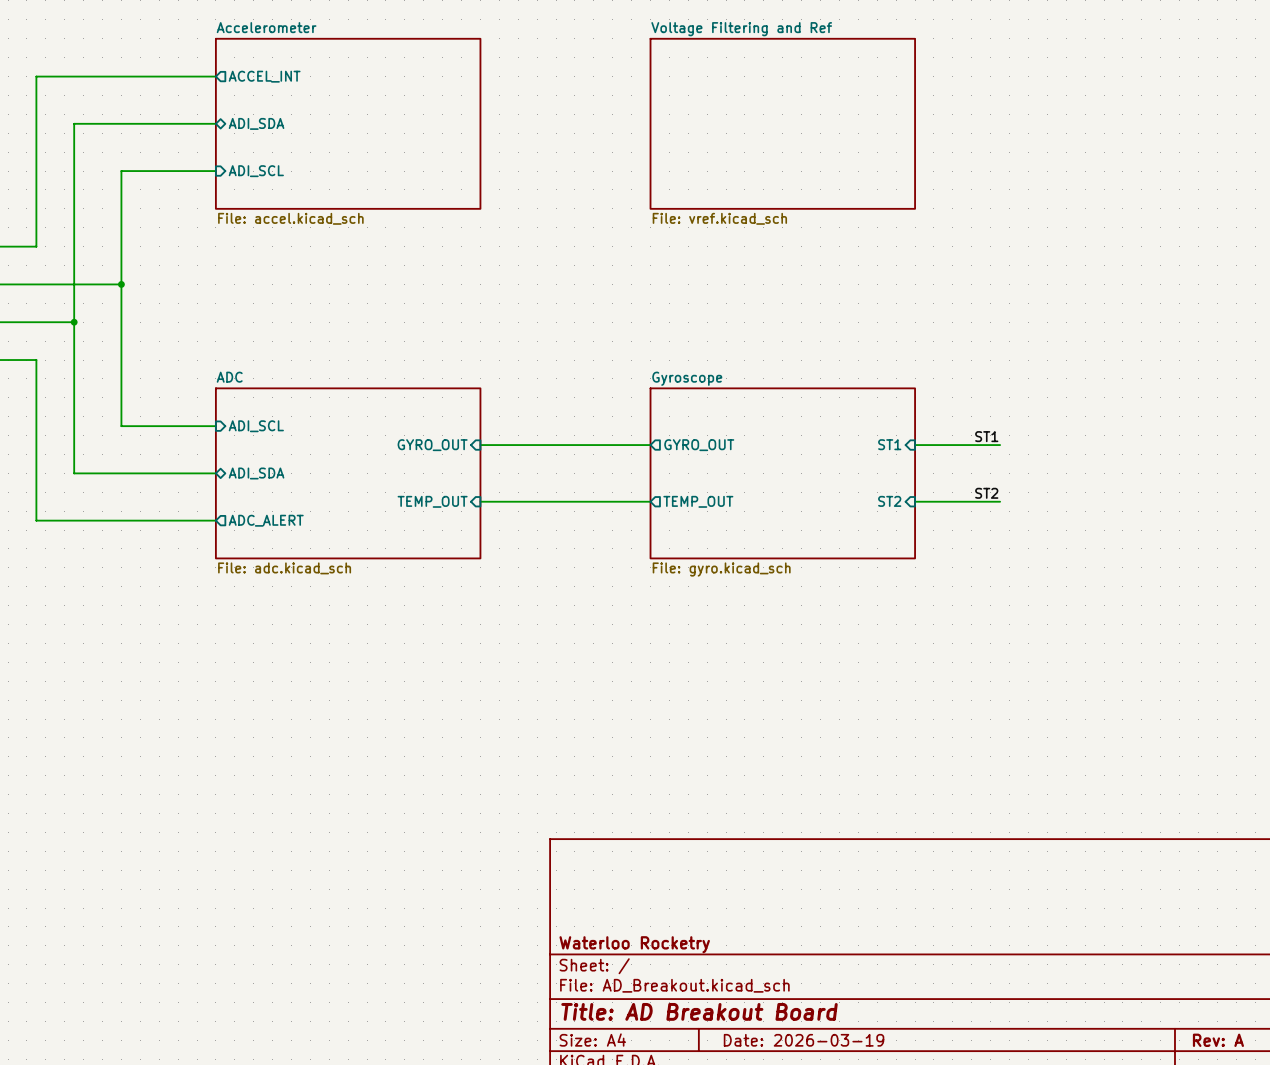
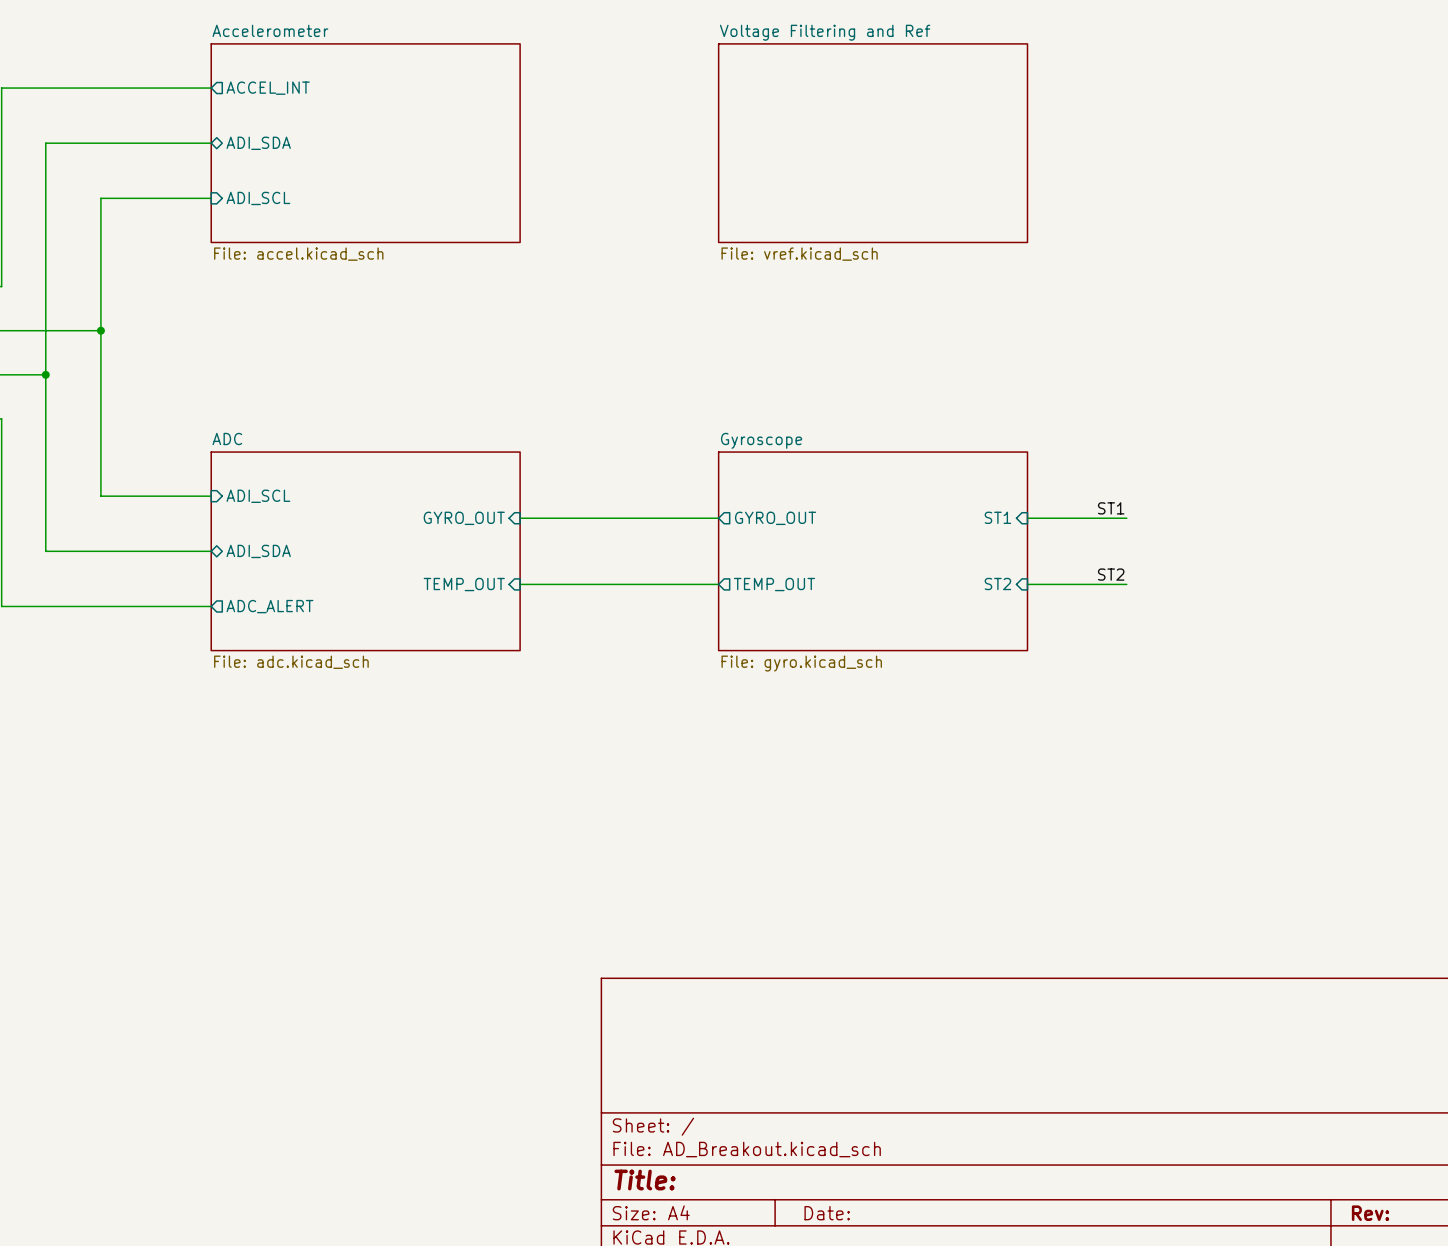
title block: Waterloo Rocketry (634, 944) -> none
title block: Title: AD Breakout Board (699, 1011) -> Title: (645, 1180)
title block: Date: 2026-03-19 (804, 1040) -> Date: (827, 1213)
title block: Rev: A (1218, 1040) -> Rev: (1370, 1213)

